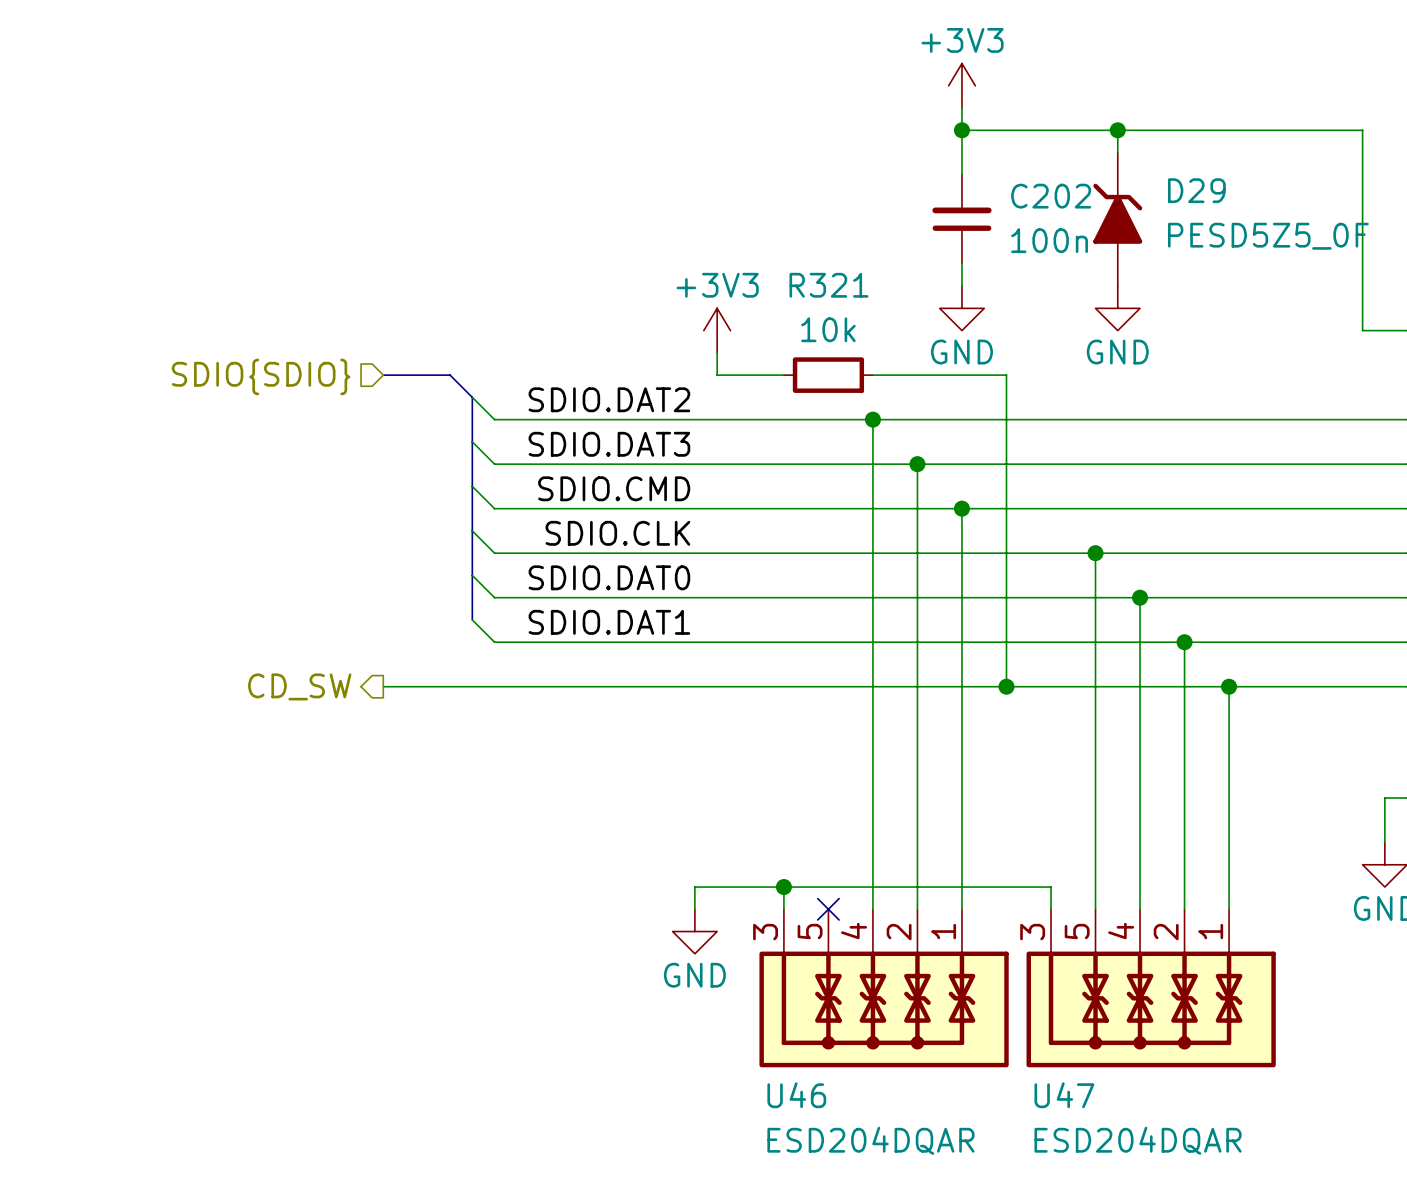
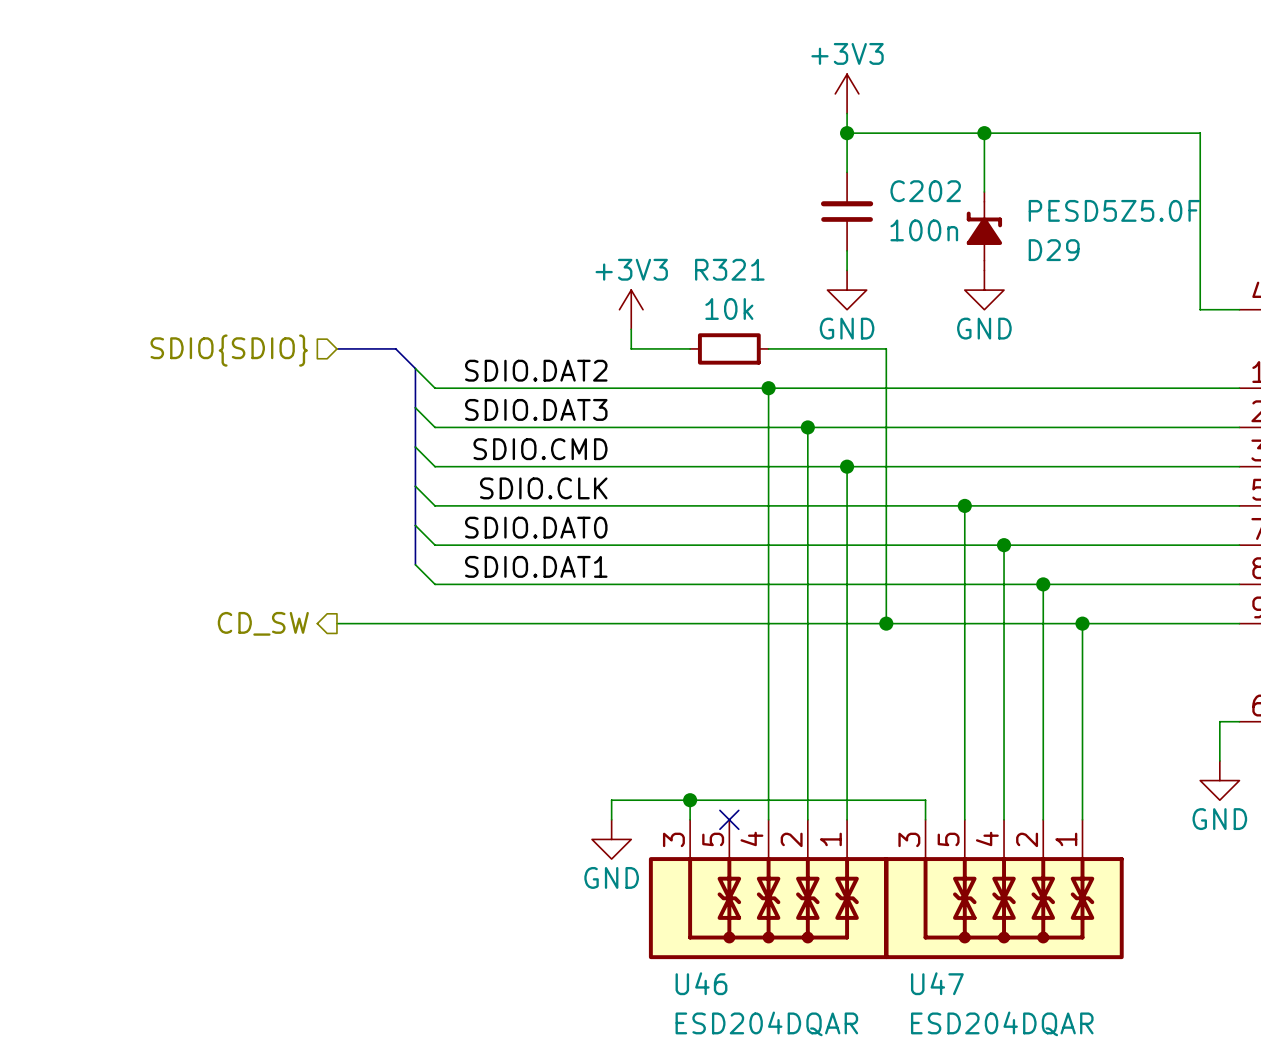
D29 symbol: [1093, 152, 1143, 287] -> [966, 192, 1003, 271]
D29 name position: D29 (1196, 190) -> D29 (1054, 250)
D29 text: none -> PESD5Z5.0F (1114, 210)
D29 value: PESD5Z5_0F (1268, 236) -> none
U46 symbol: [759, 909, 1009, 1068] -> [648, 819, 889, 960]
U47 symbol: [1026, 909, 1276, 1068] -> [884, 819, 1124, 960]

